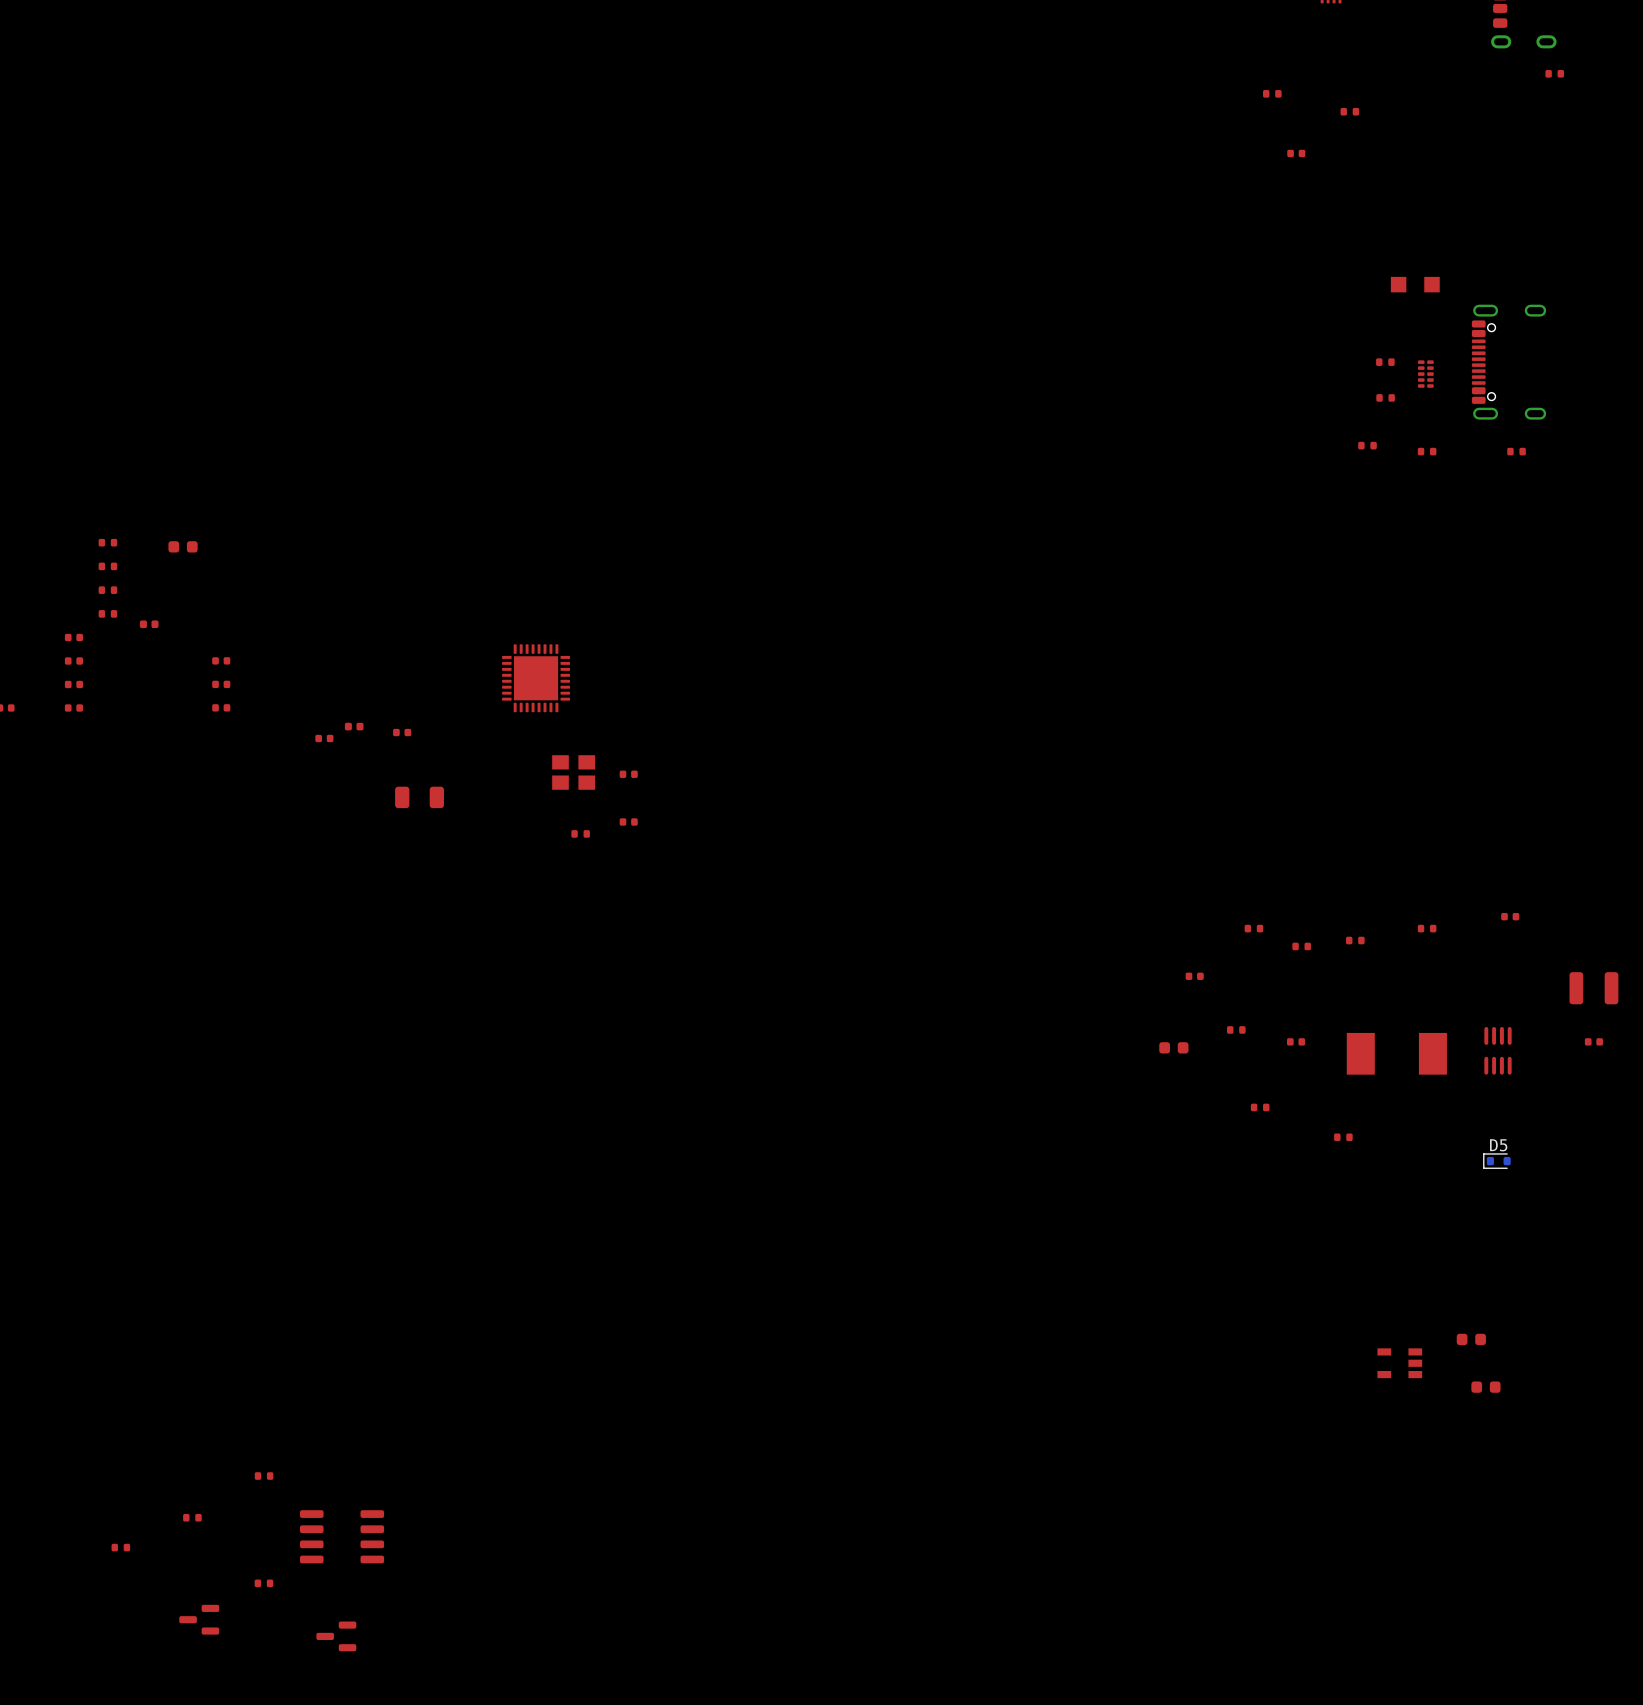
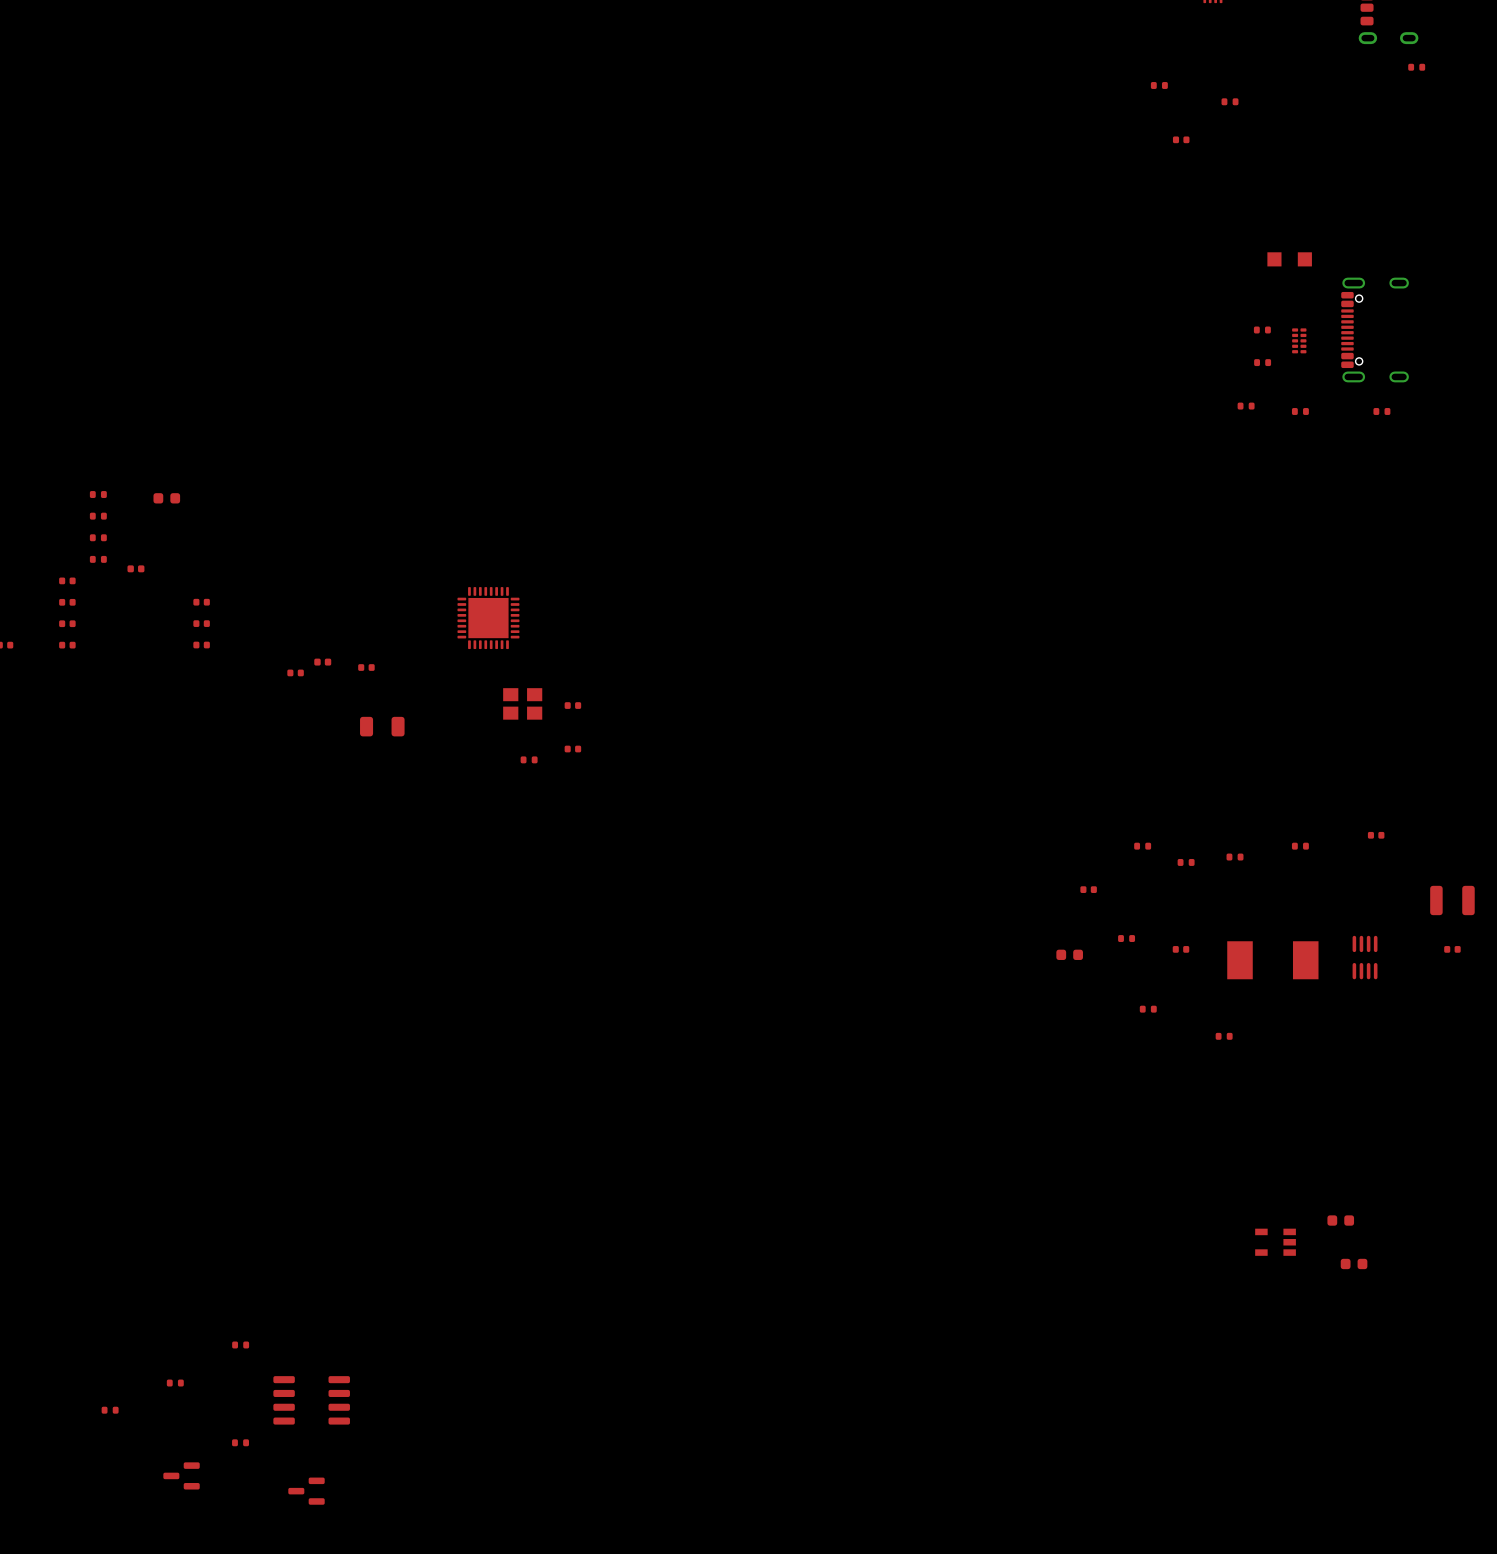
D5: (1496, 1161) -> none

